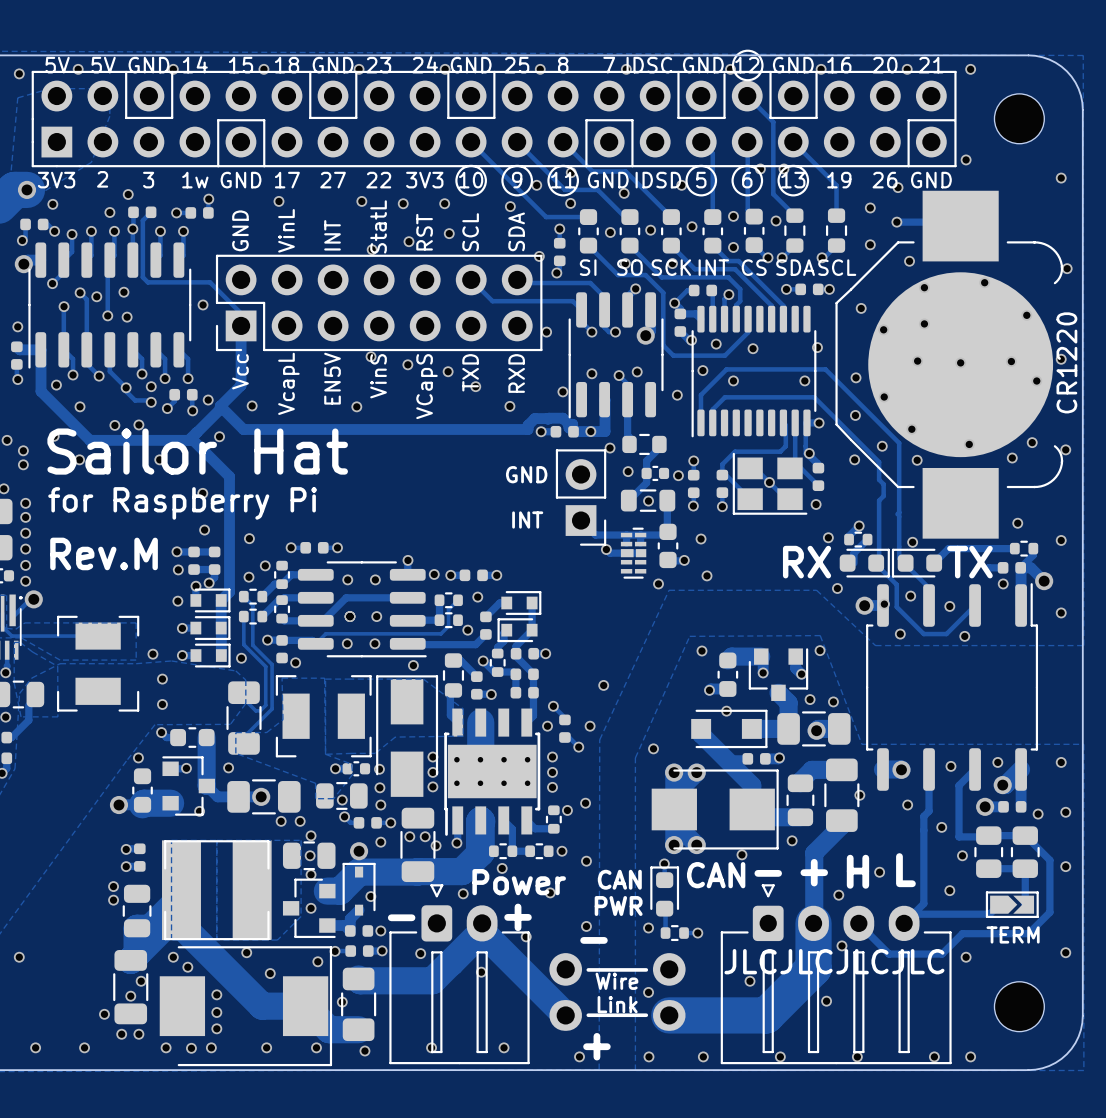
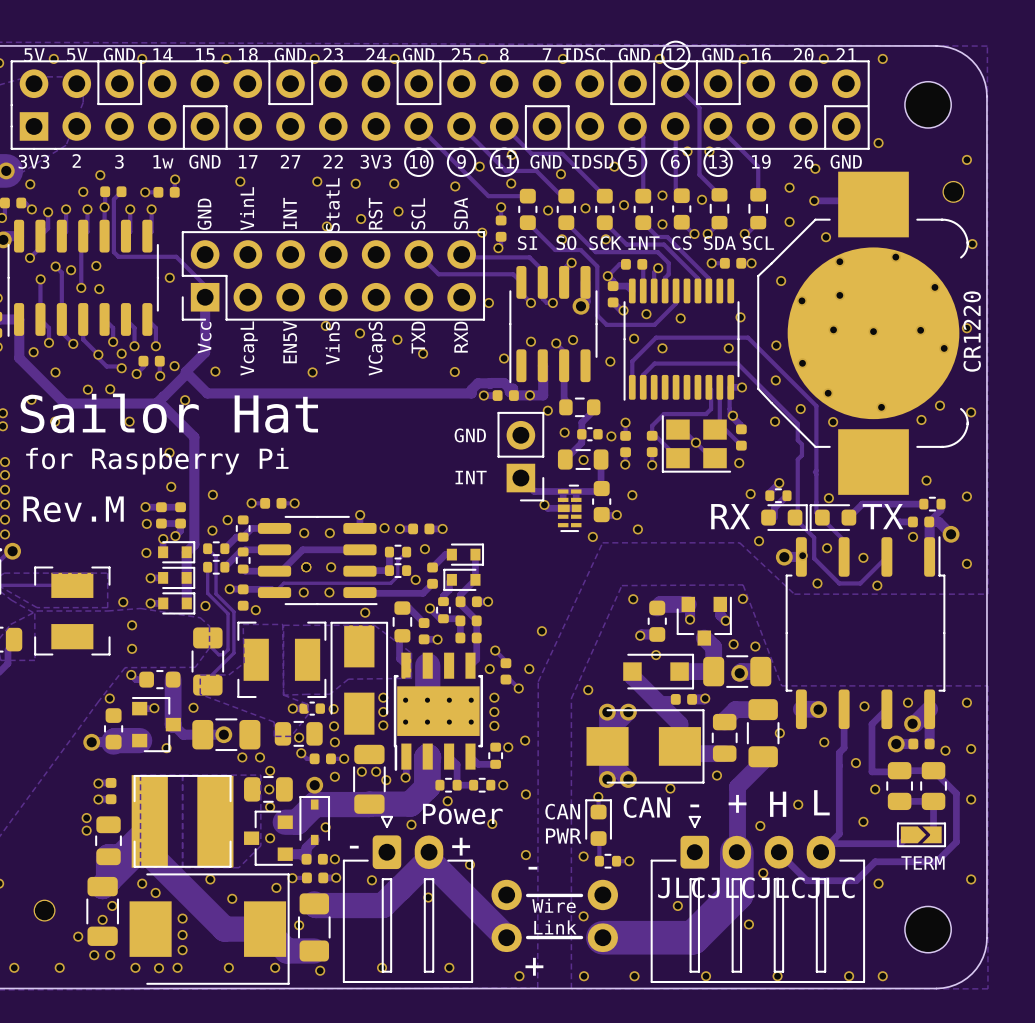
part: none -> (953, 191)
part: none -> (44, 910)

